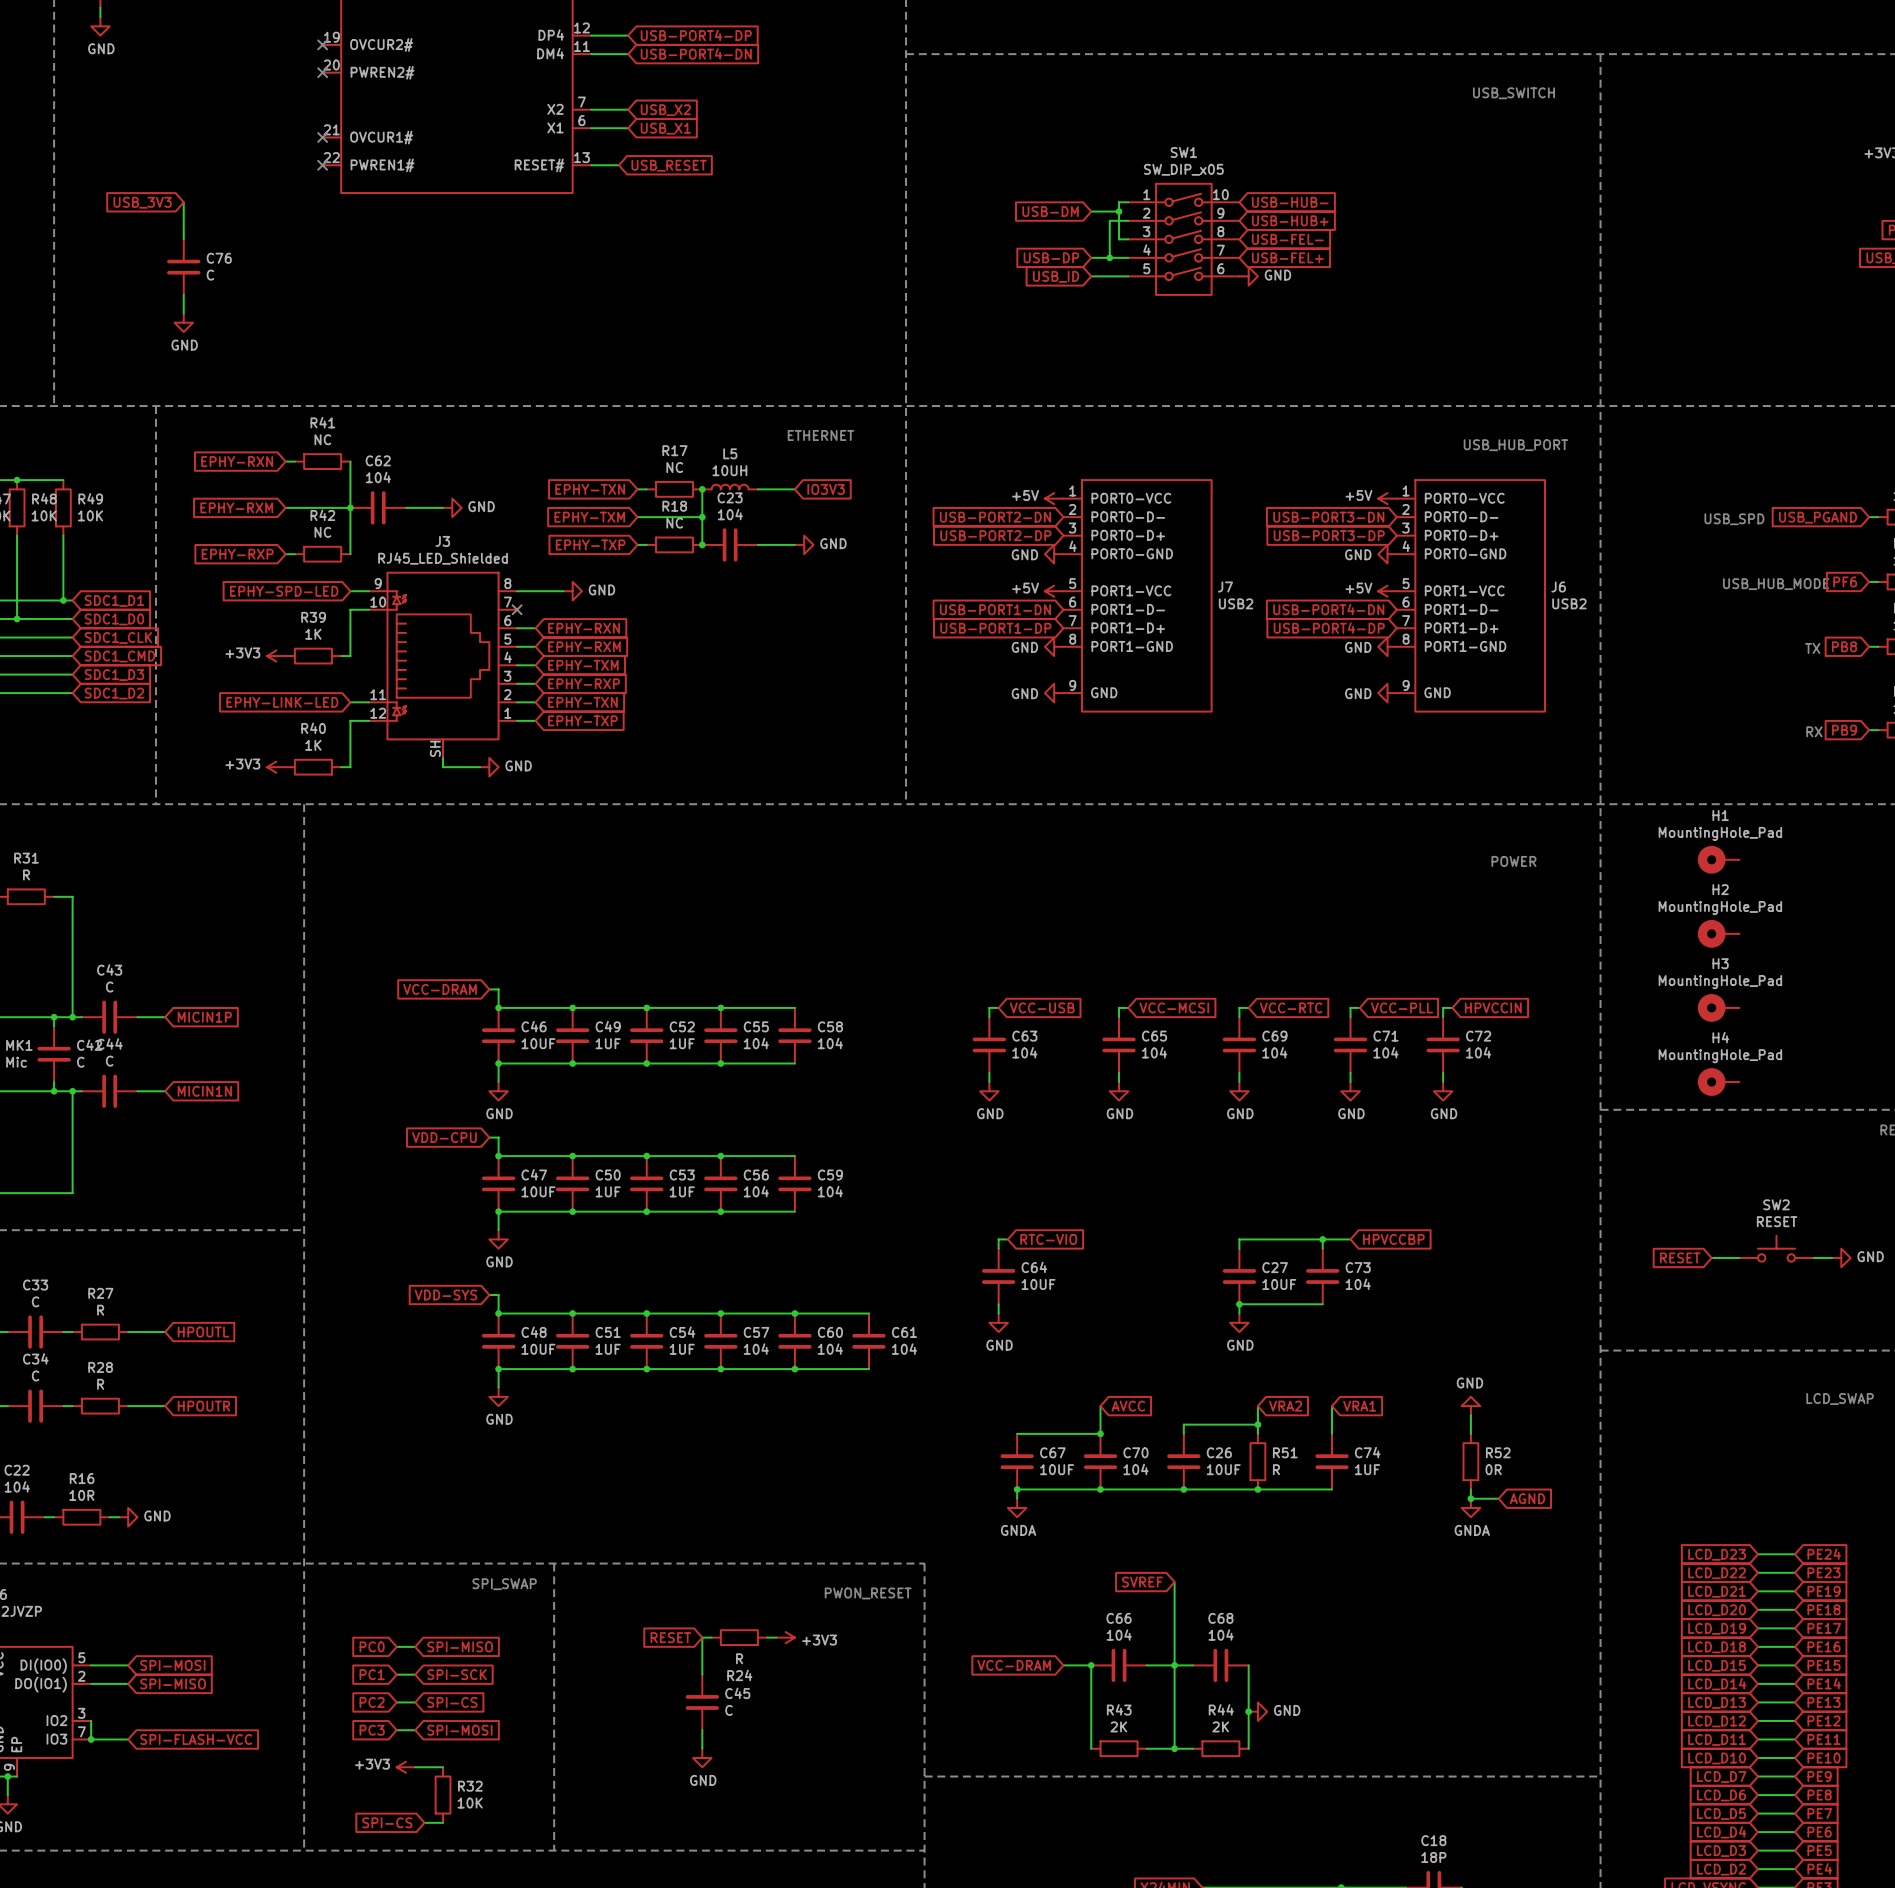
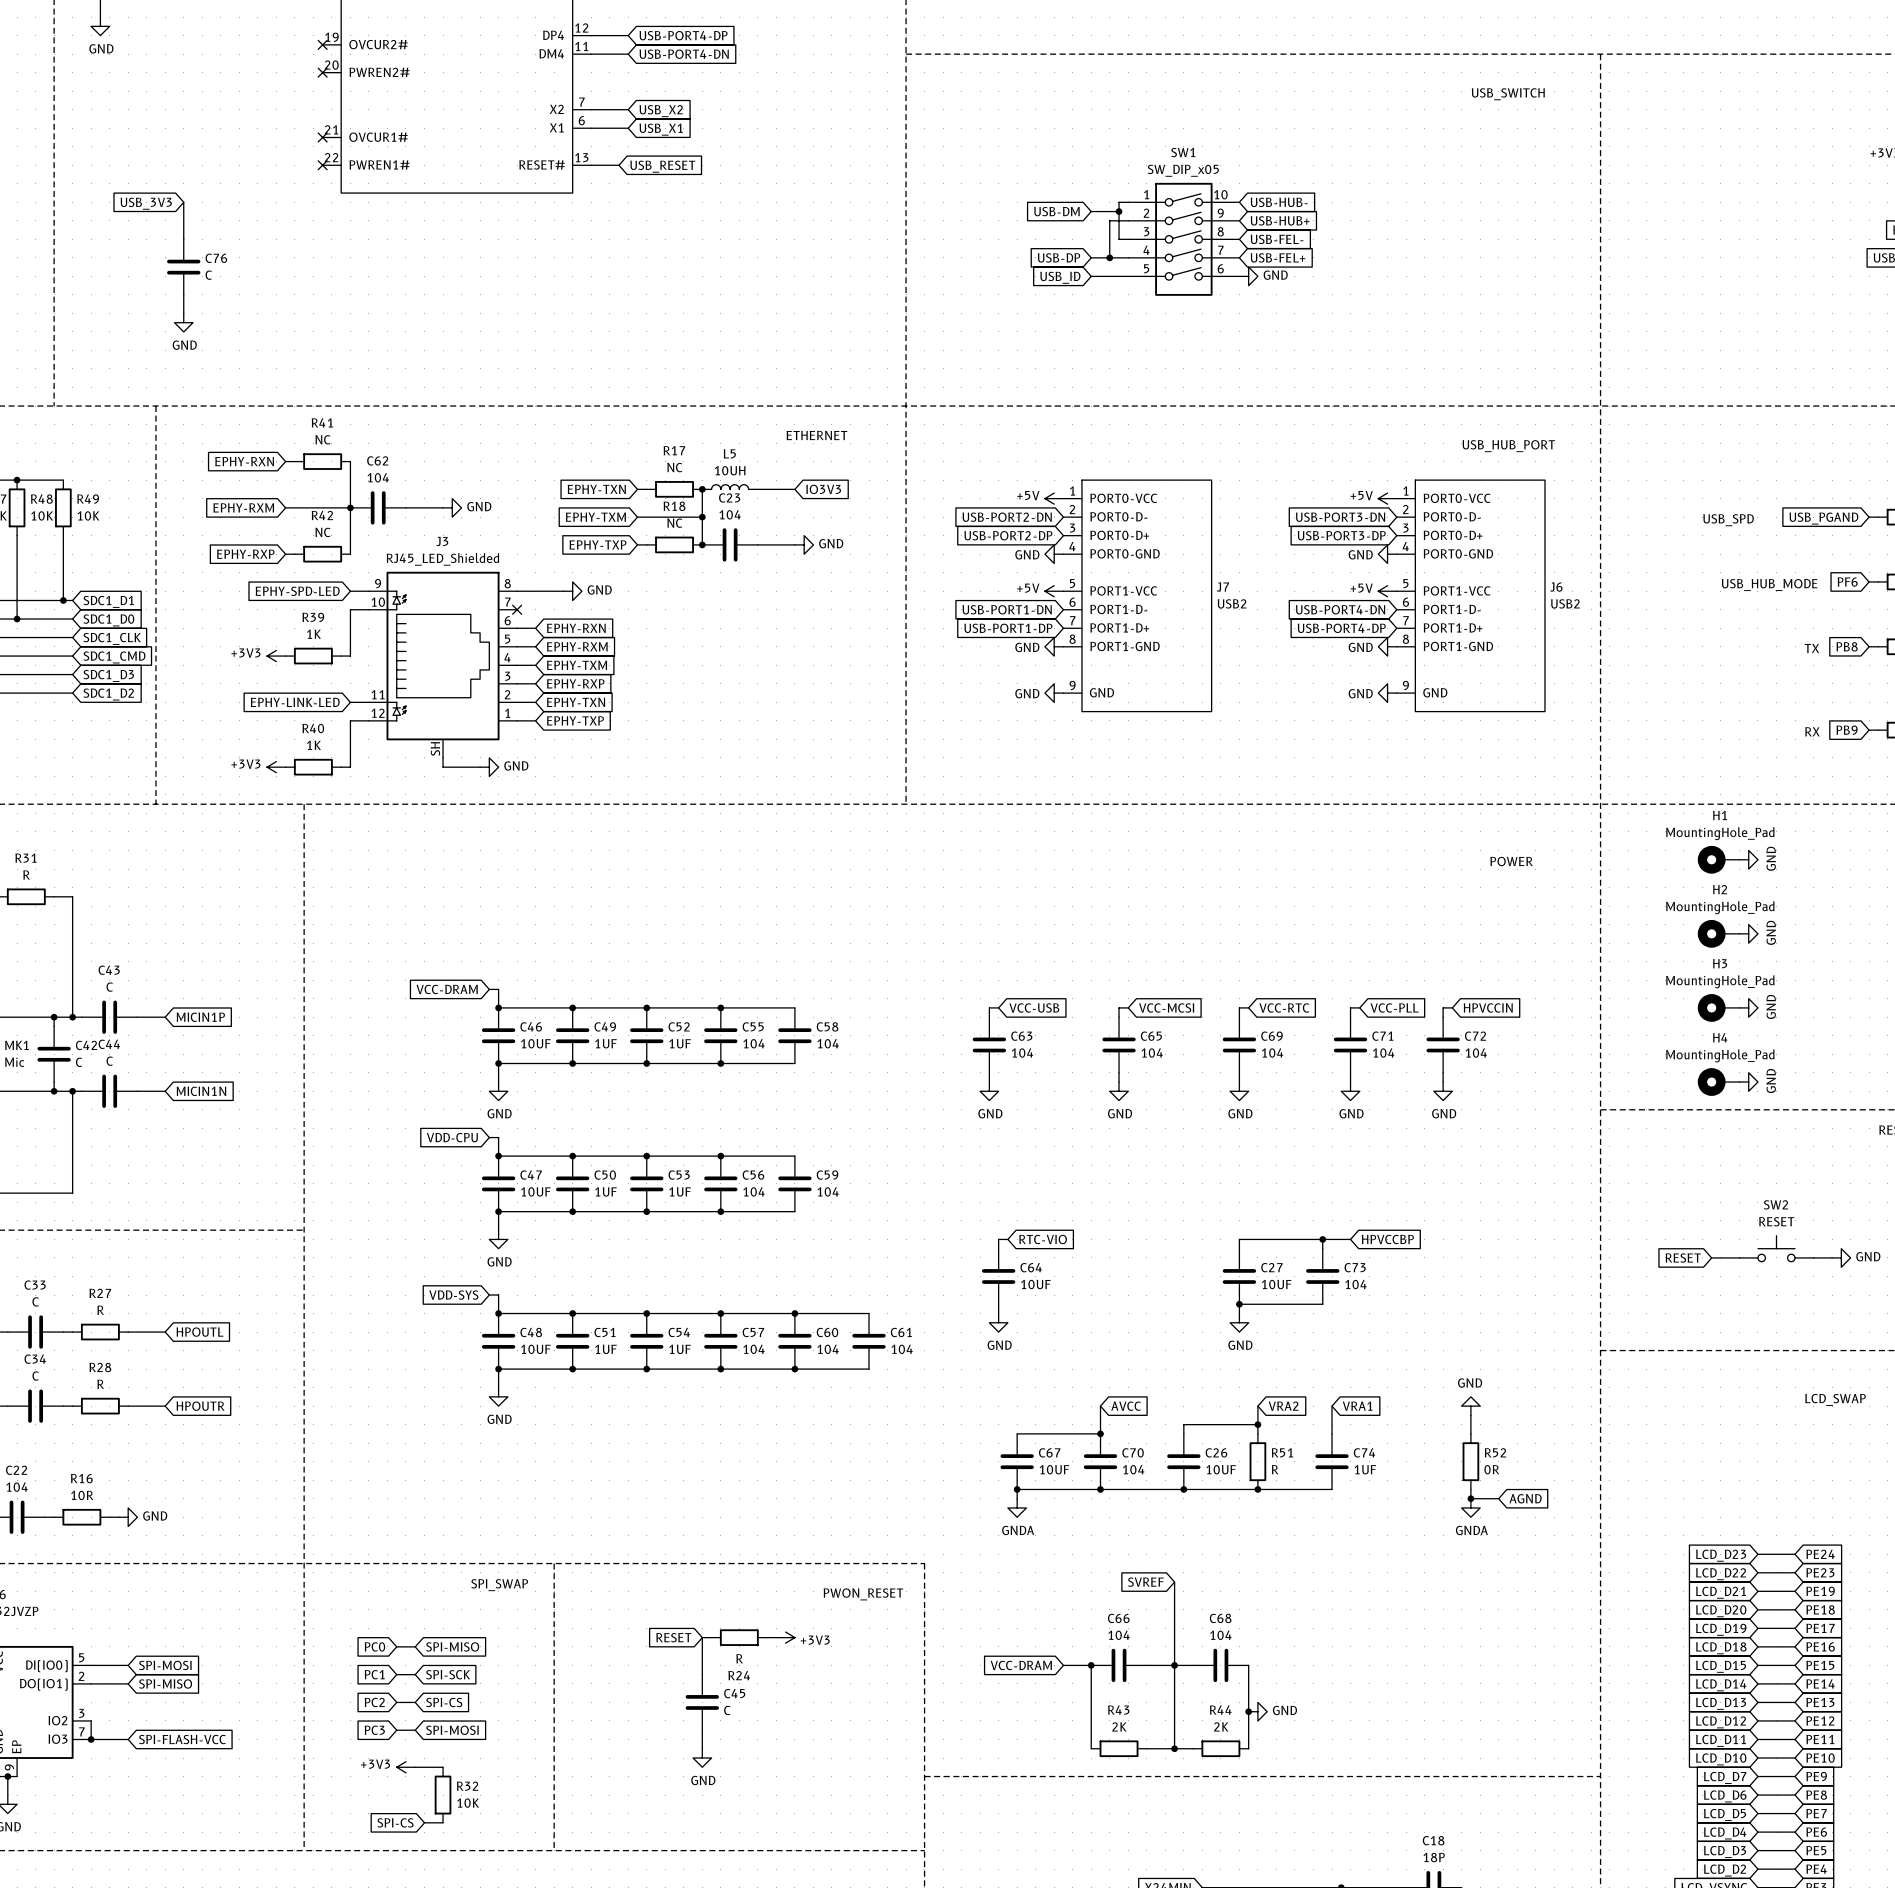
power symbol: none -> GND (1748, 859)
power symbol: none -> GND (1748, 933)
power symbol: none -> GND (1748, 1007)
power symbol: none -> GND (1748, 1082)

